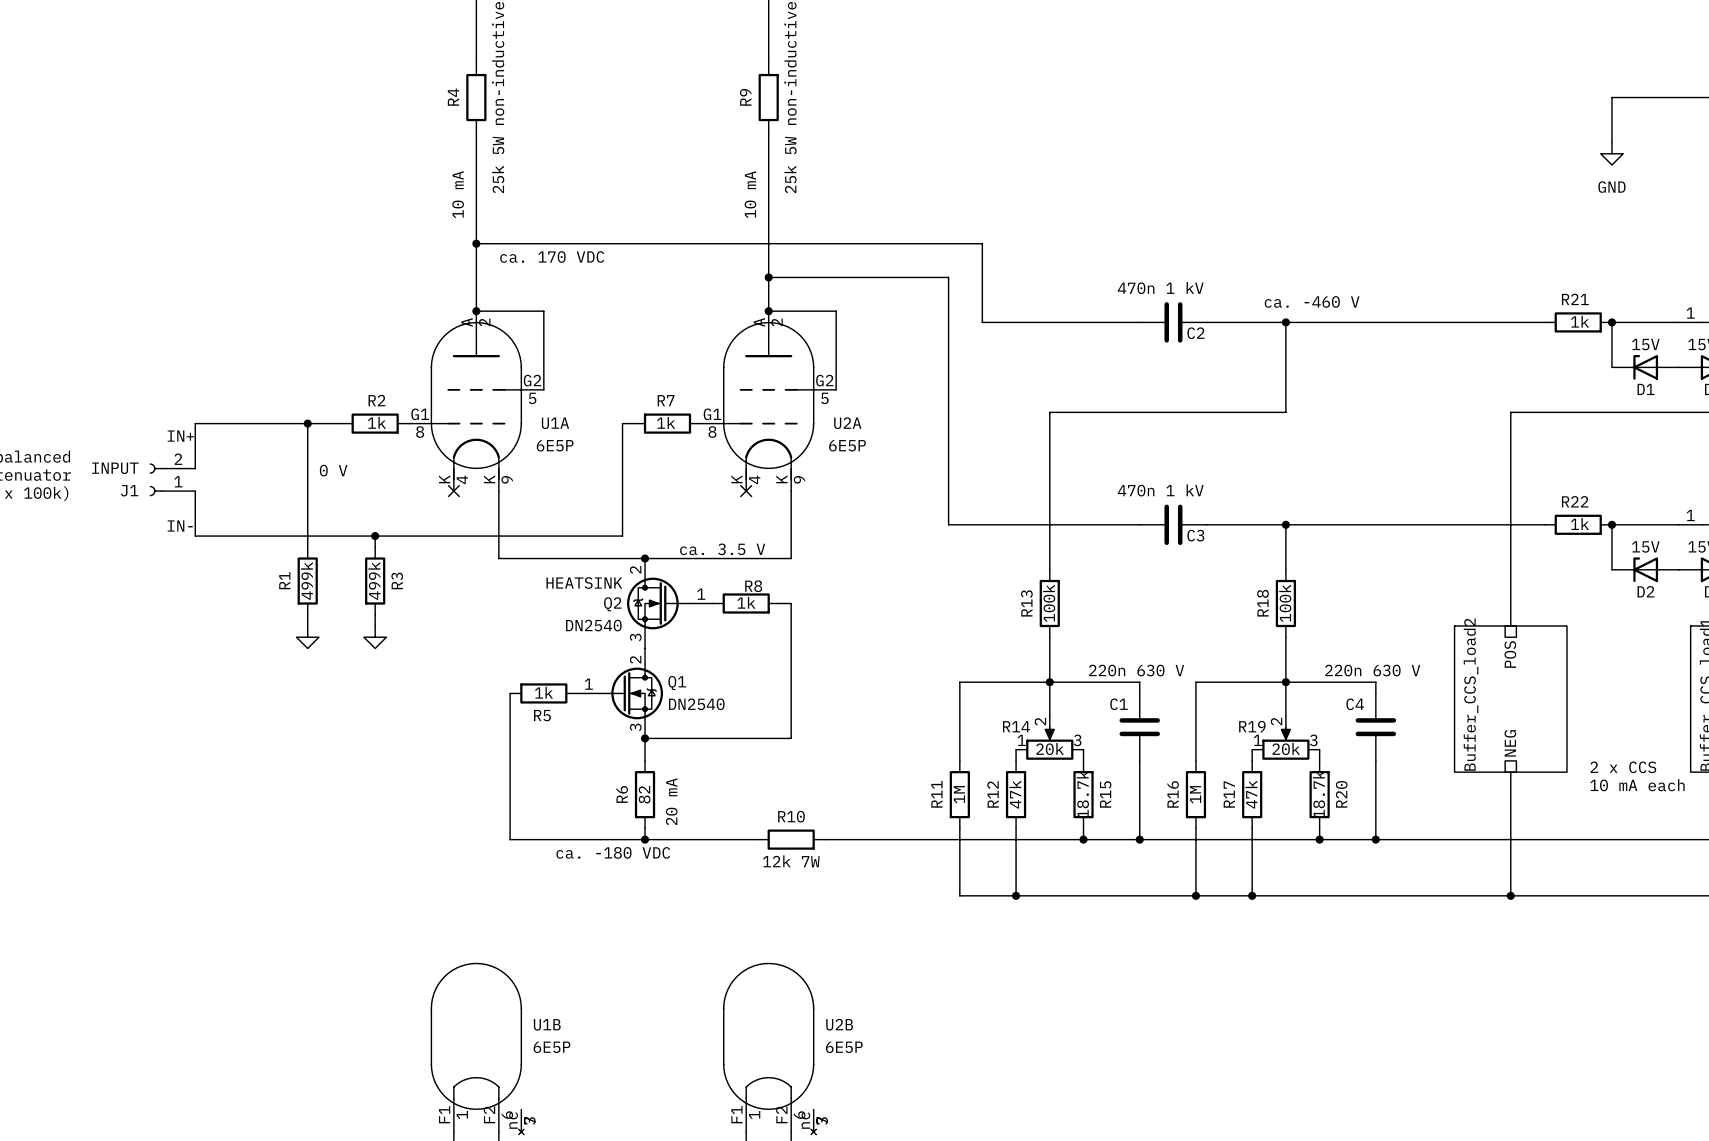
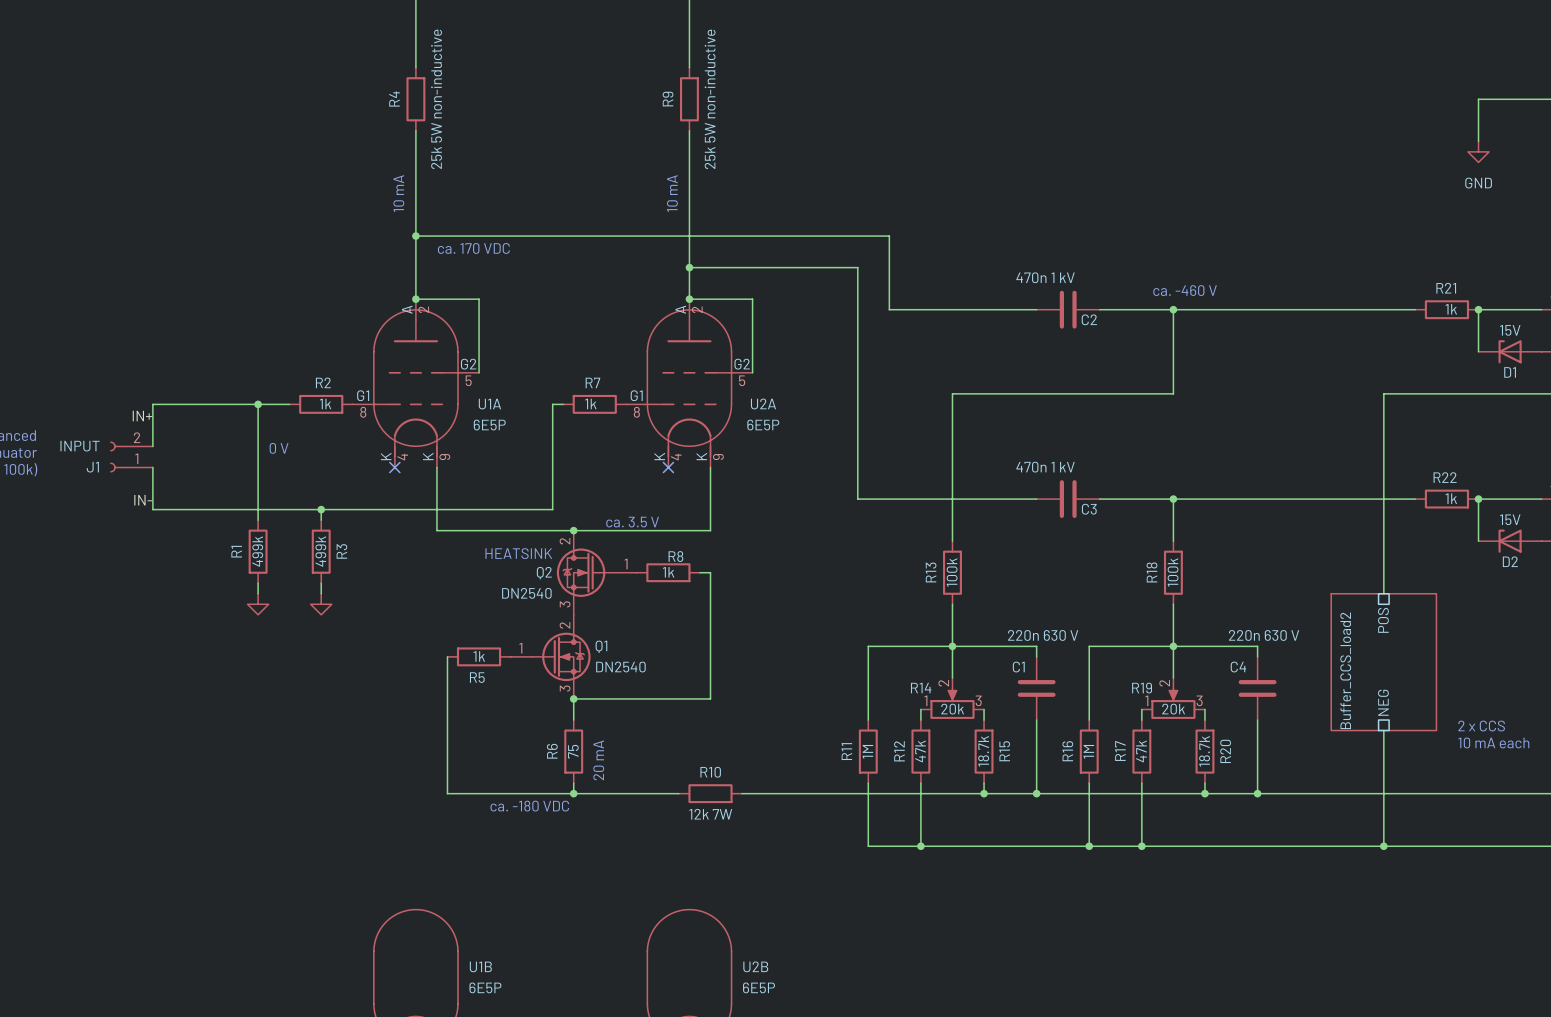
R6 value: 82 (644, 794) -> 75 (573, 751)

